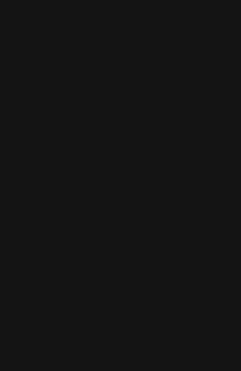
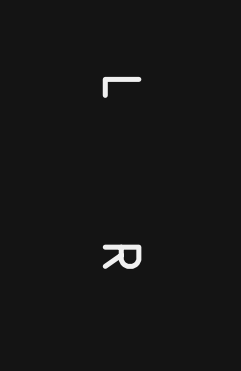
text: none -> L (122, 87)
text: none -> R (122, 256)

